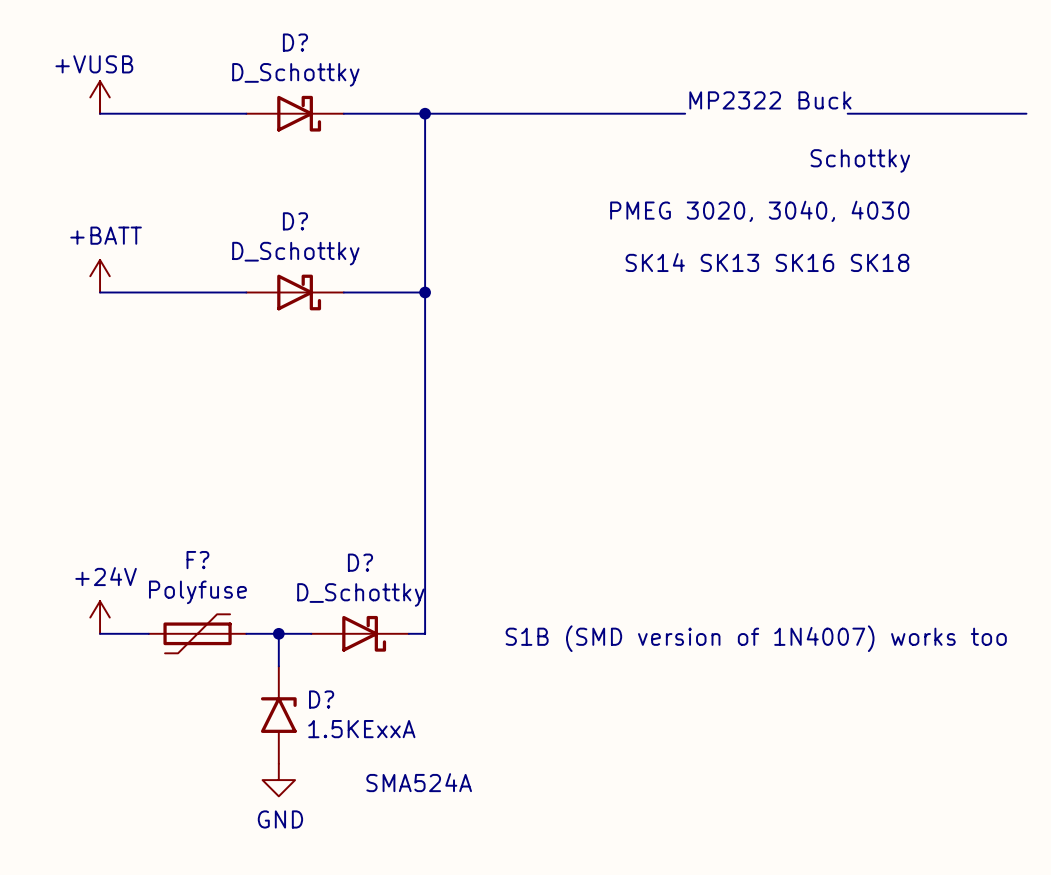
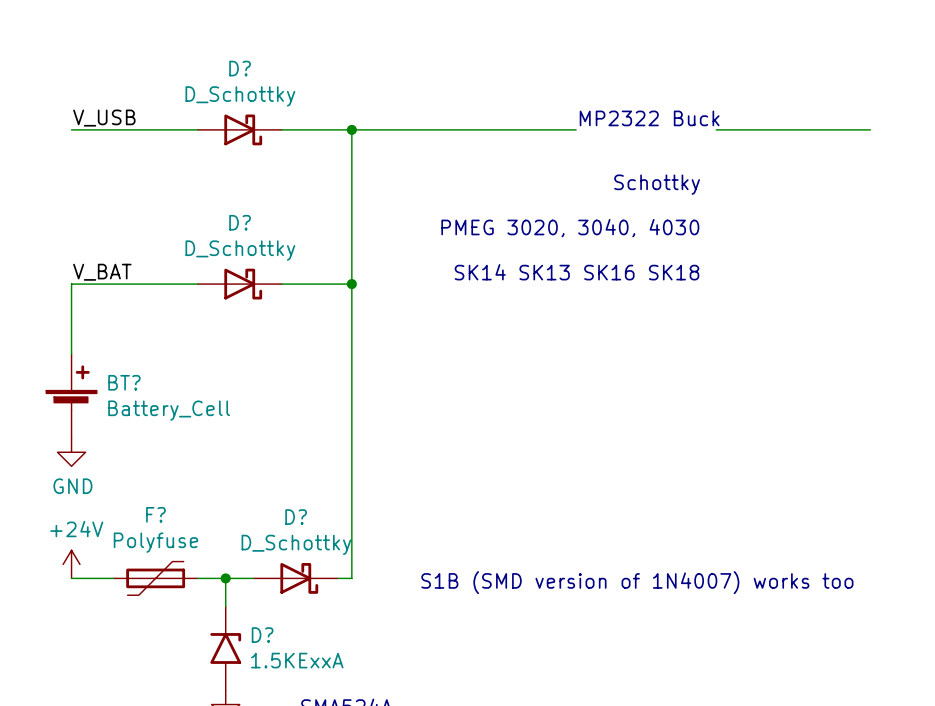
power symbol: +VUSB (100, 97) -> none
label: none -> V_USB (104, 118)
text position: Schottky (860, 160) -> Schottky (657, 184)
text position: PMEG 3020, 3040, 4030 (759, 211) -> PMEG 3020, 3040, 4030 (570, 228)
text position: SK14 SK13 SK16 SK18 (767, 262) -> SK14 SK13 SK16 SK18 (576, 272)
power symbol: +BATT (100, 276) -> none
label: none -> V_BAT (102, 272)
wire: none -> (71, 284) (71, 354)
BT?: none -> Battery_Cell (71, 396)
power symbol: none -> GND (71, 452)

